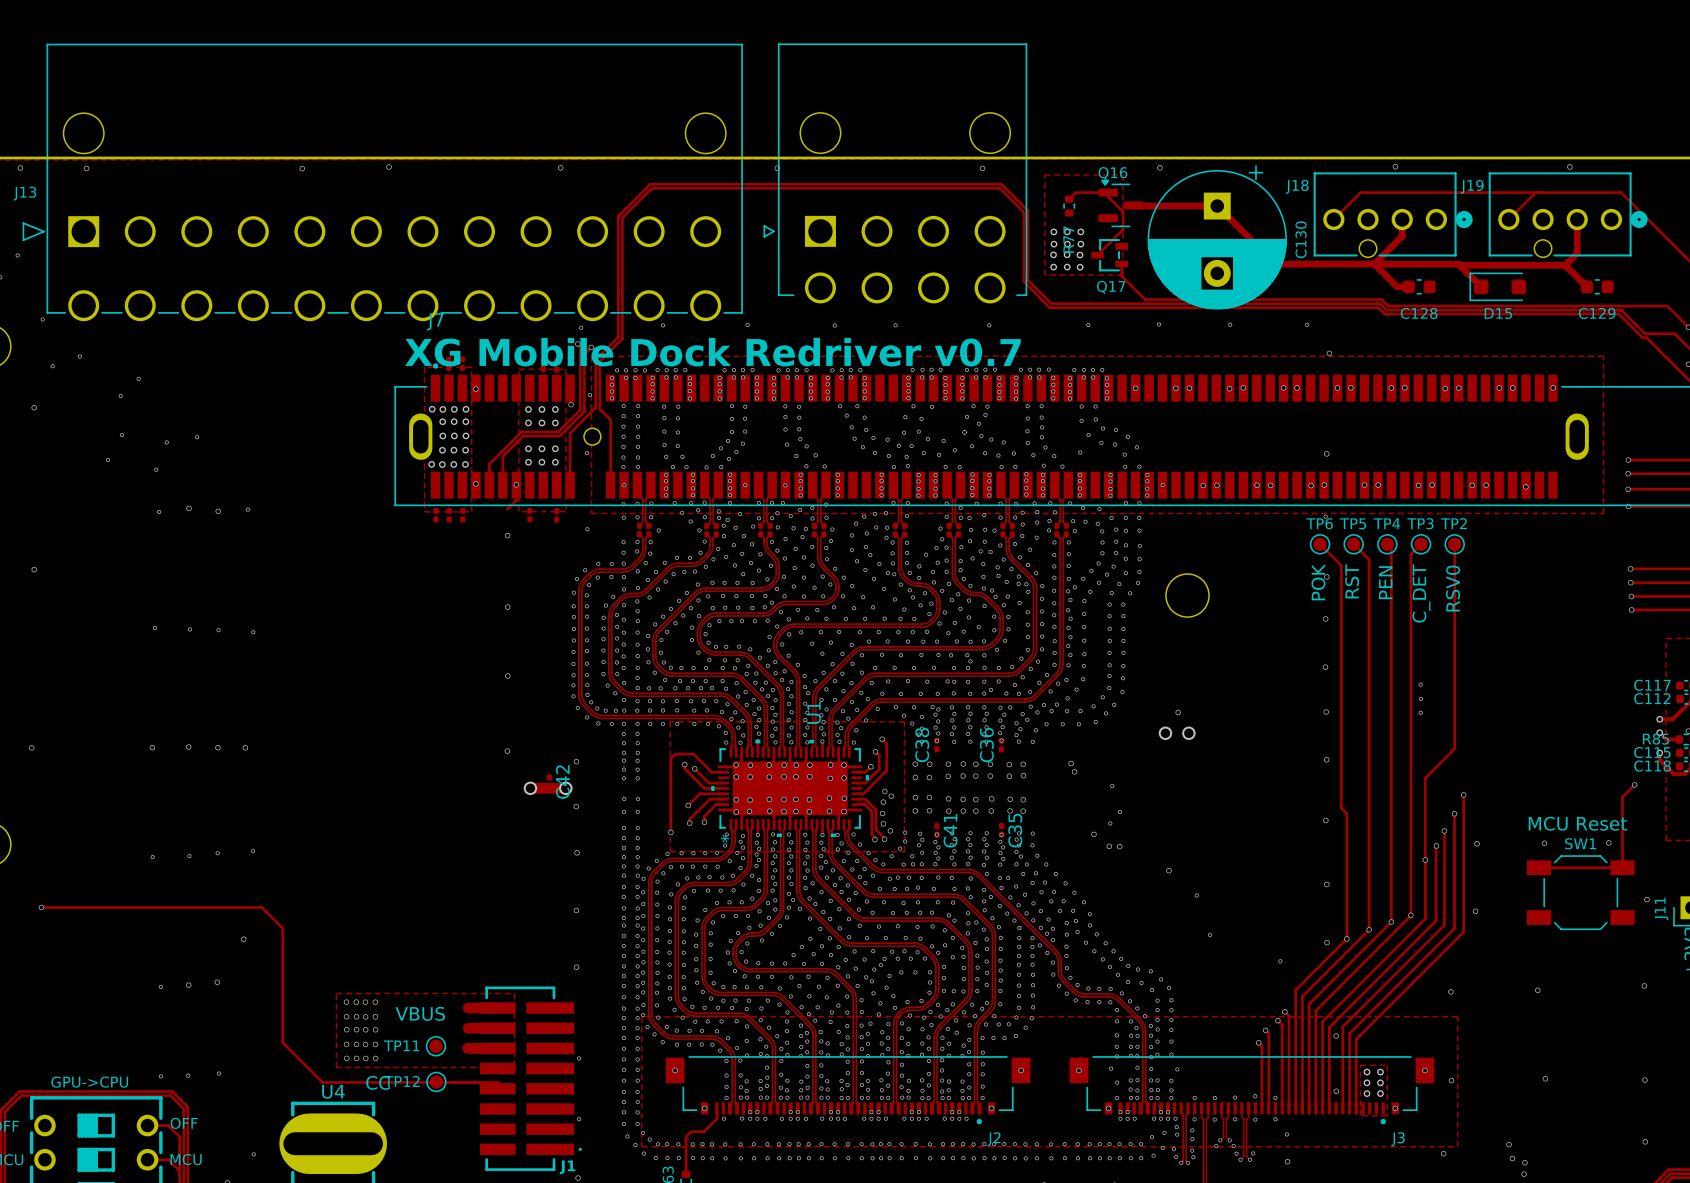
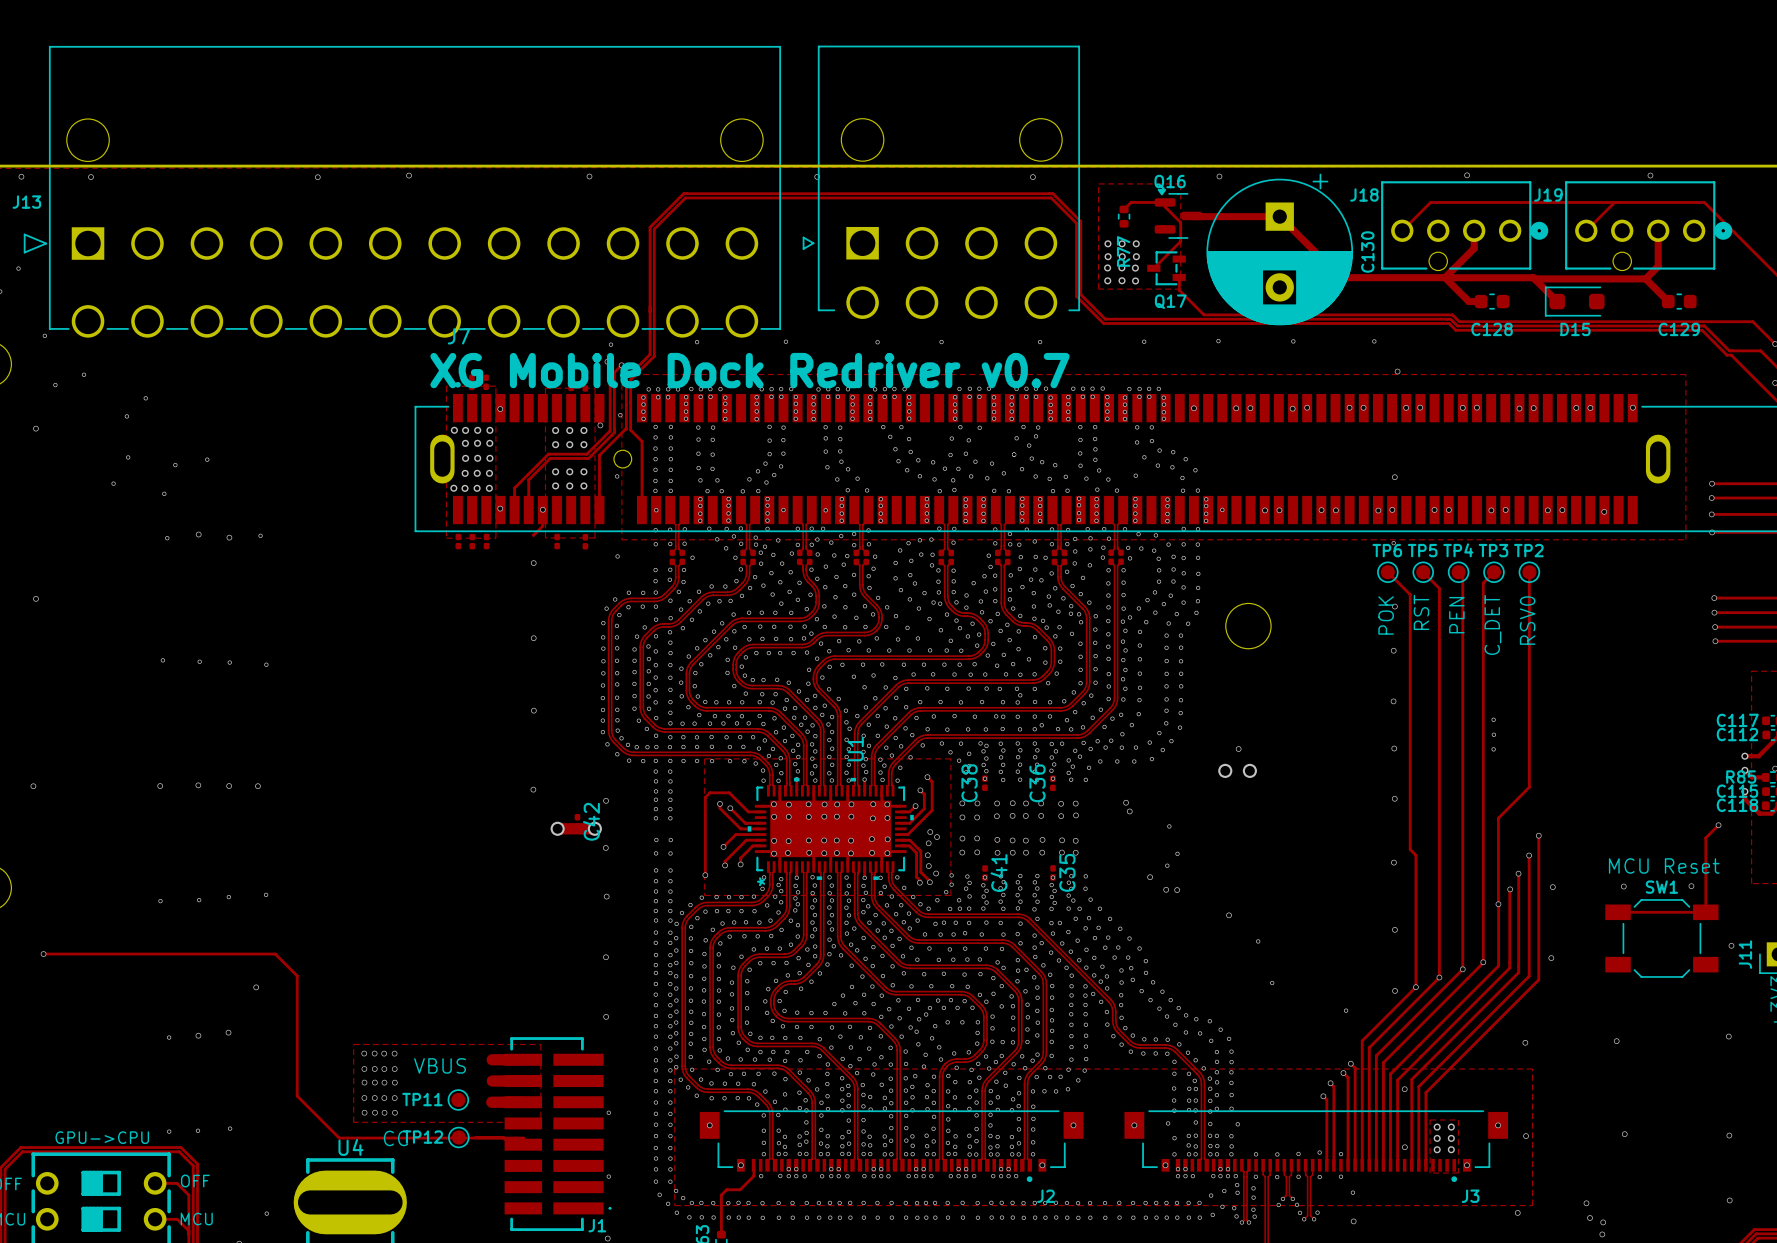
U1 footprint: [711, 739, 870, 837] -> [747, 777, 914, 880]

